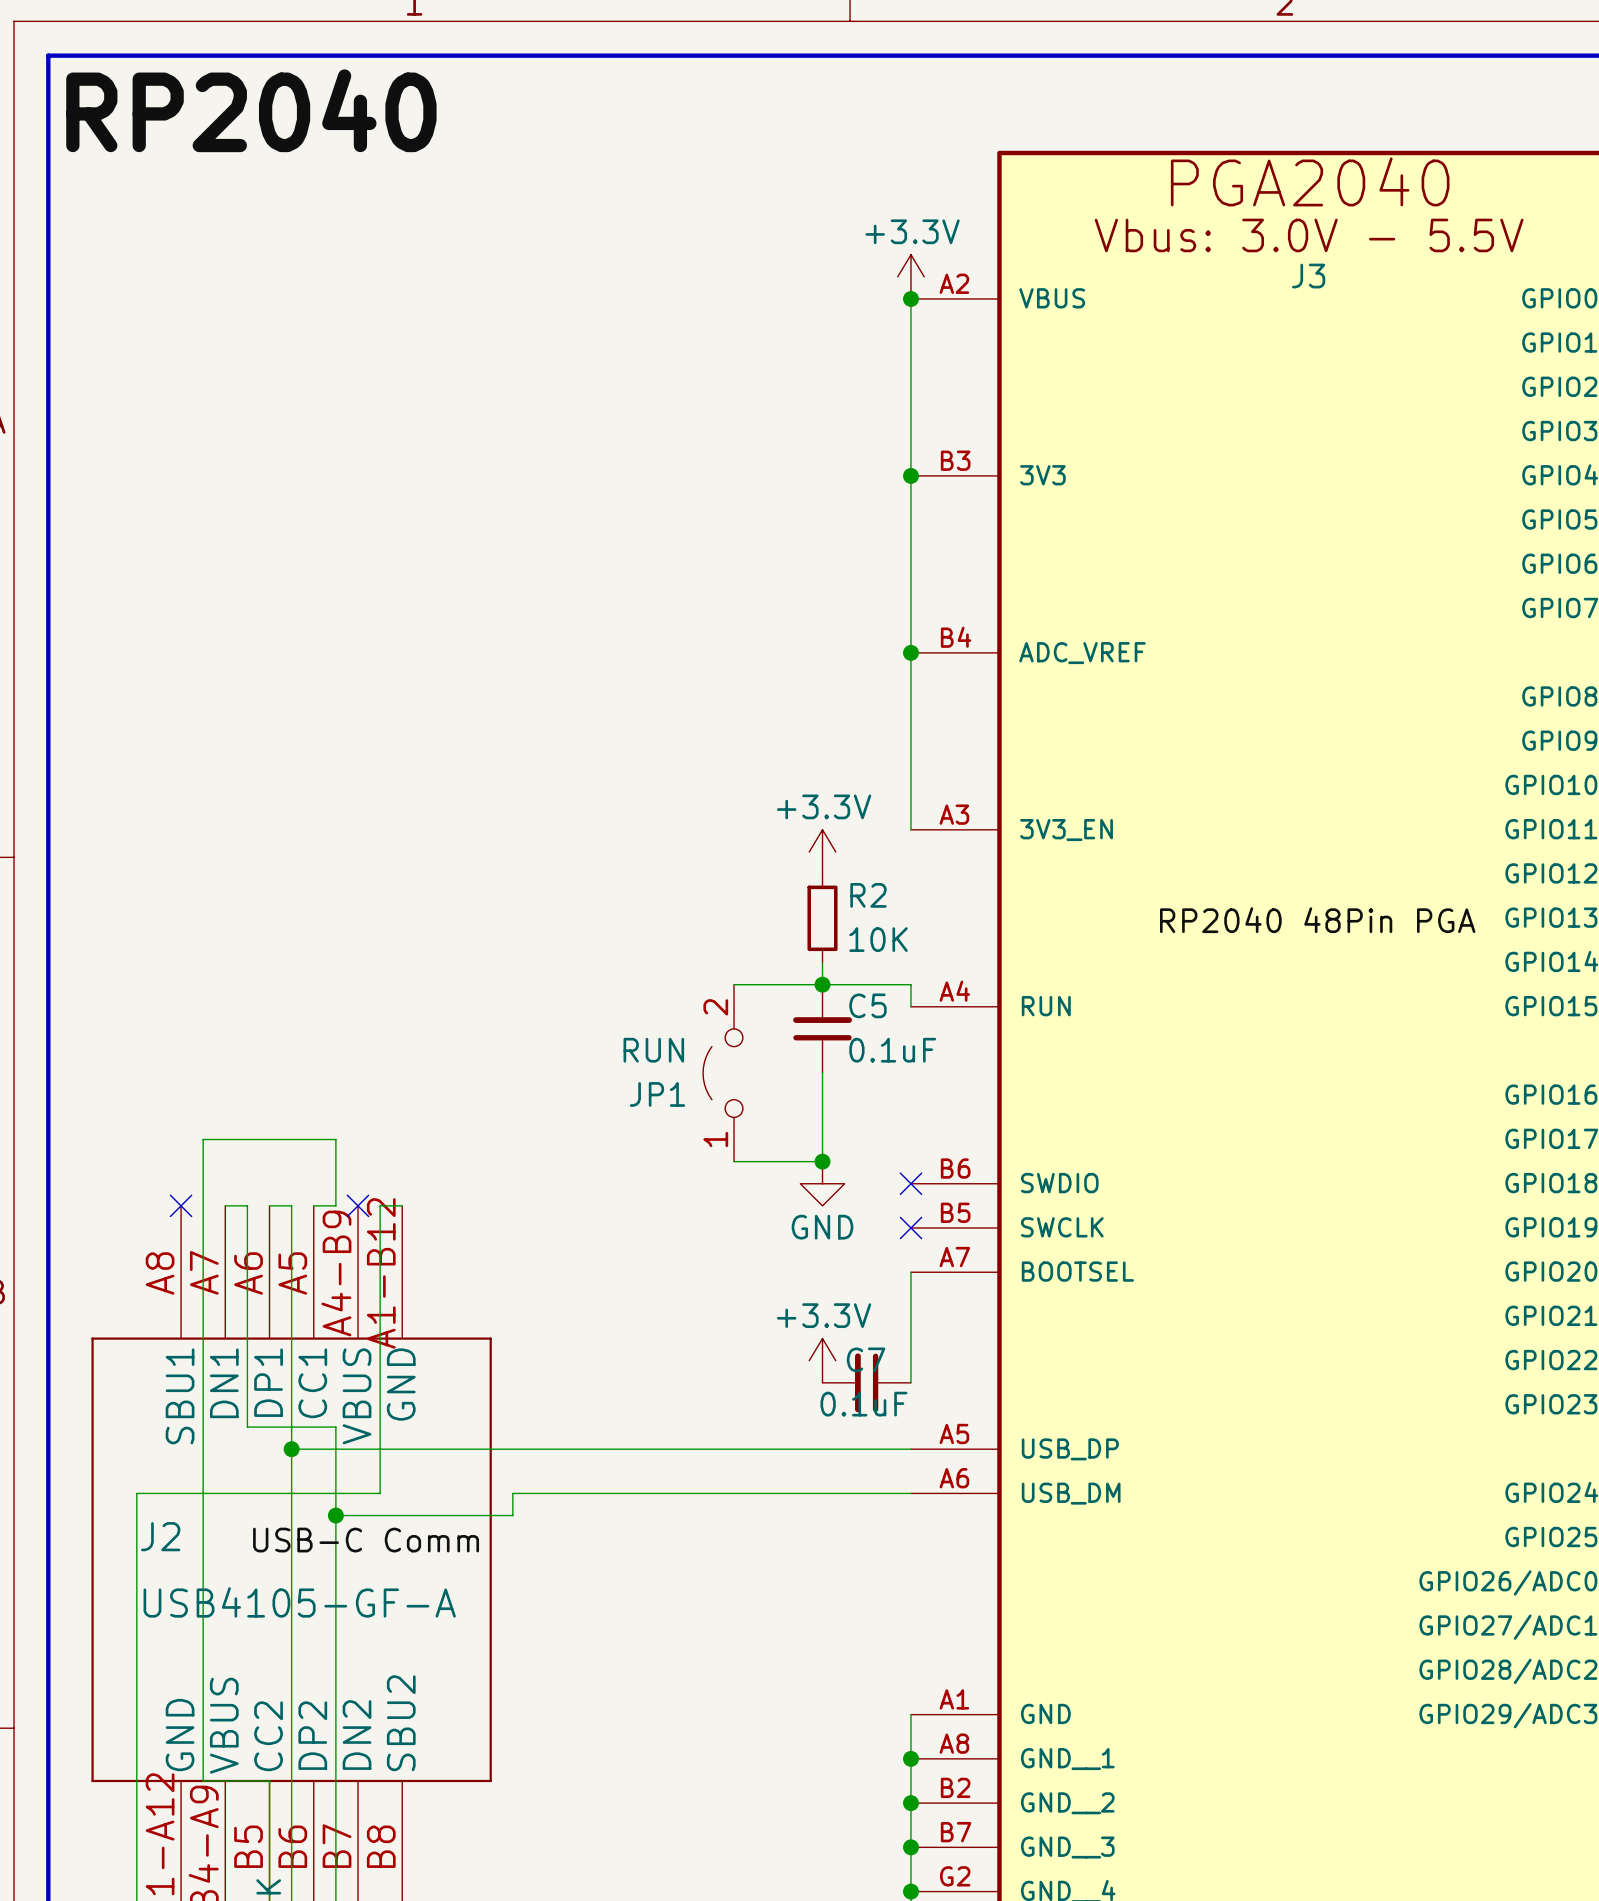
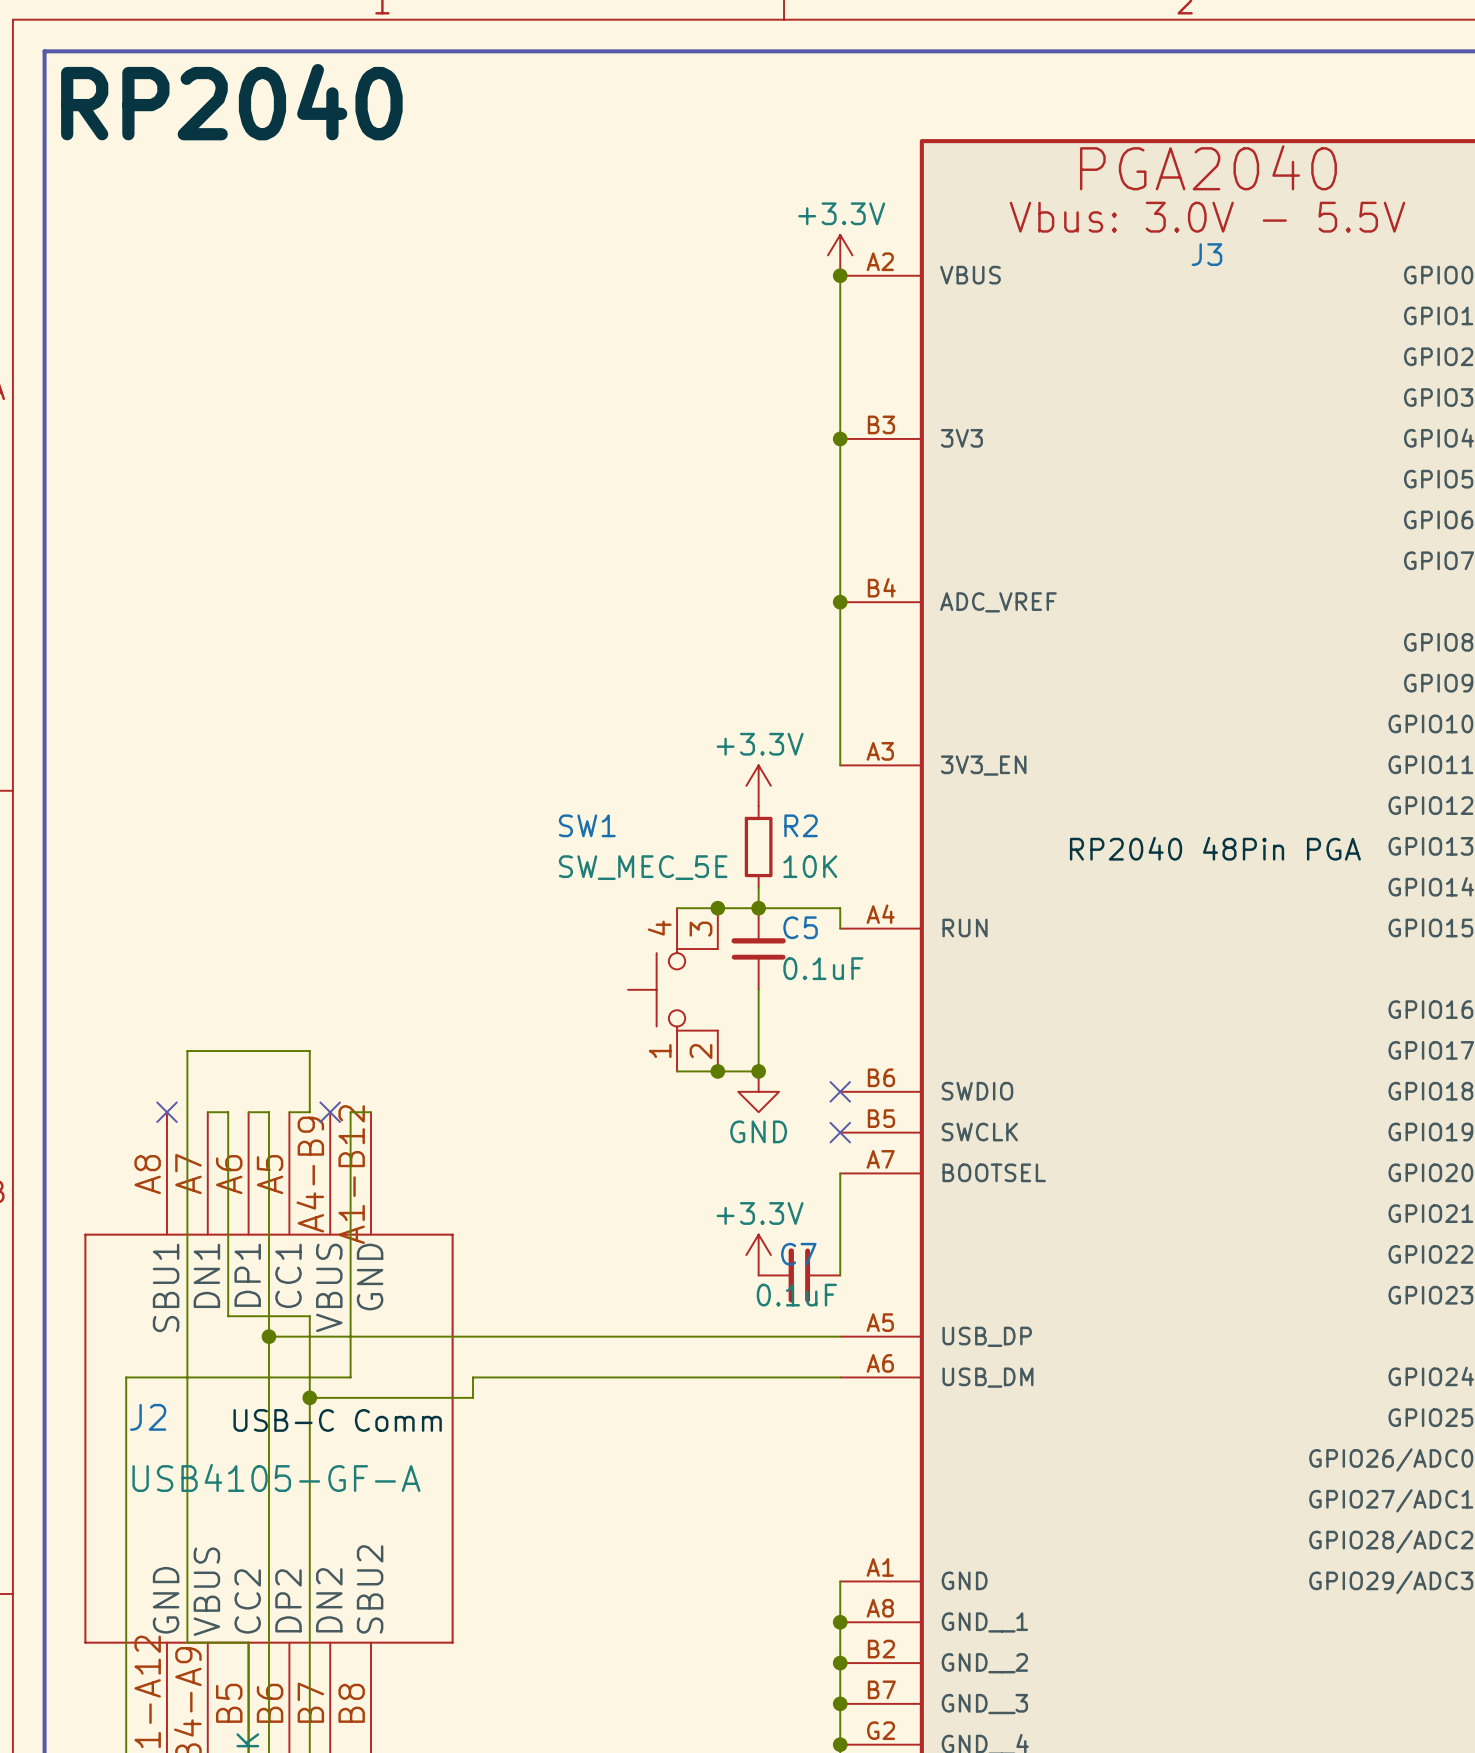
junction: none -> (717, 908)
JP1: RUN (722, 1073) -> none
SW1: none -> SW_MEC_5E (672, 989)
junction: none -> (717, 1071)

